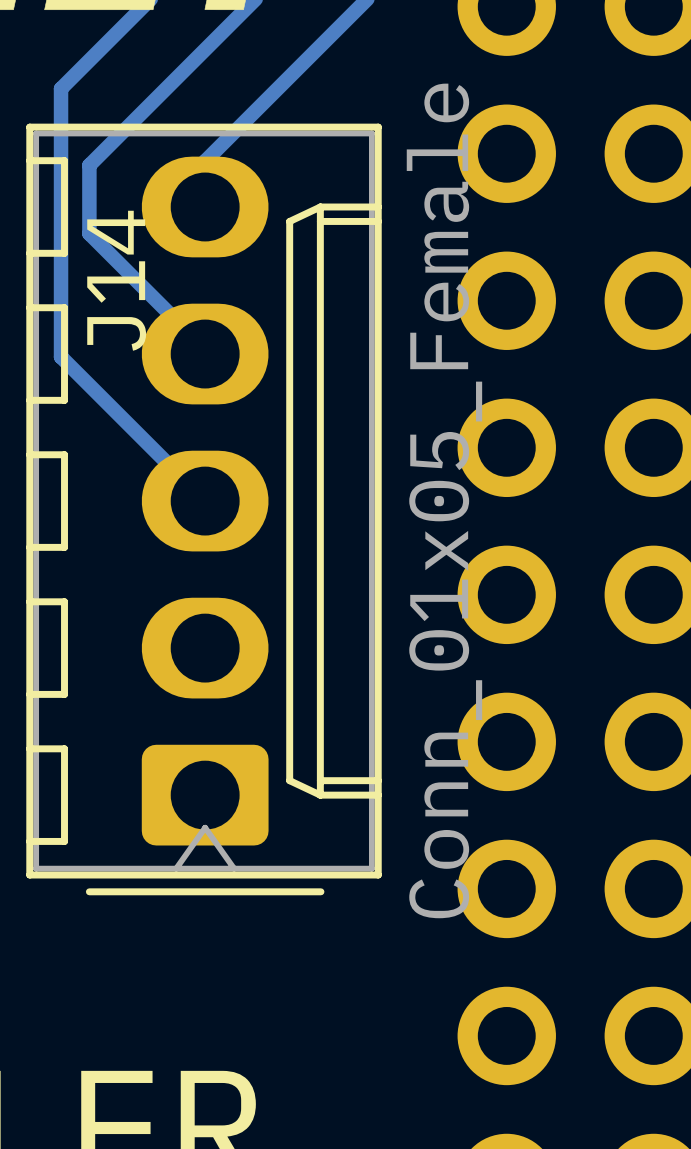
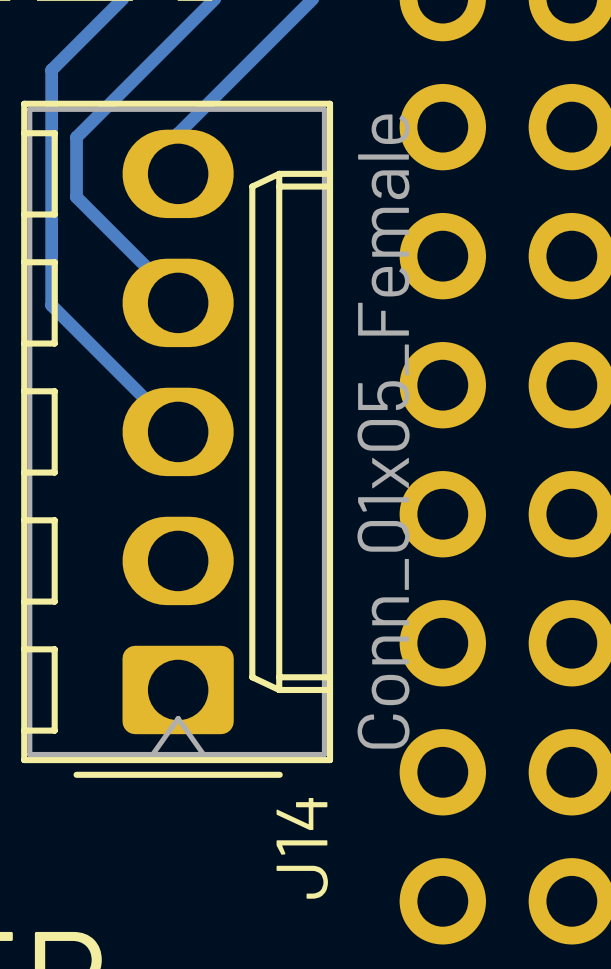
J14 name position: J14 (116, 280) -> J14 (302, 848)

